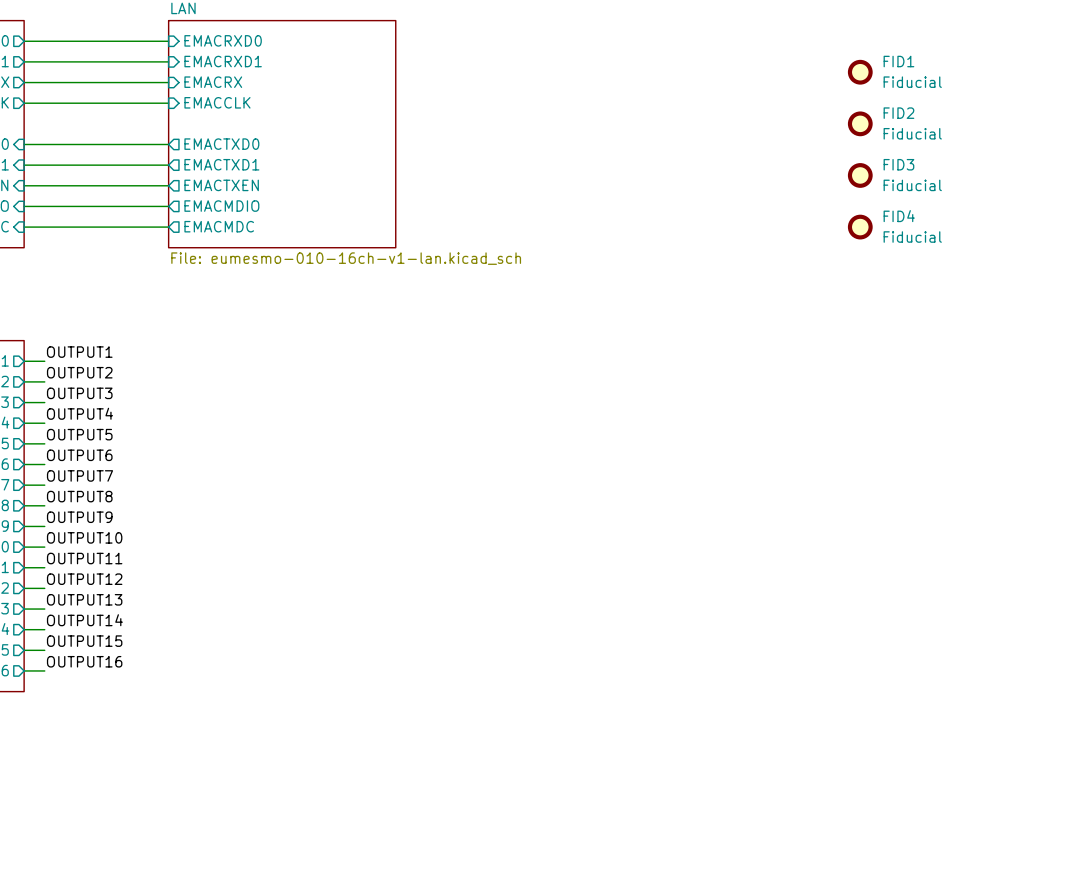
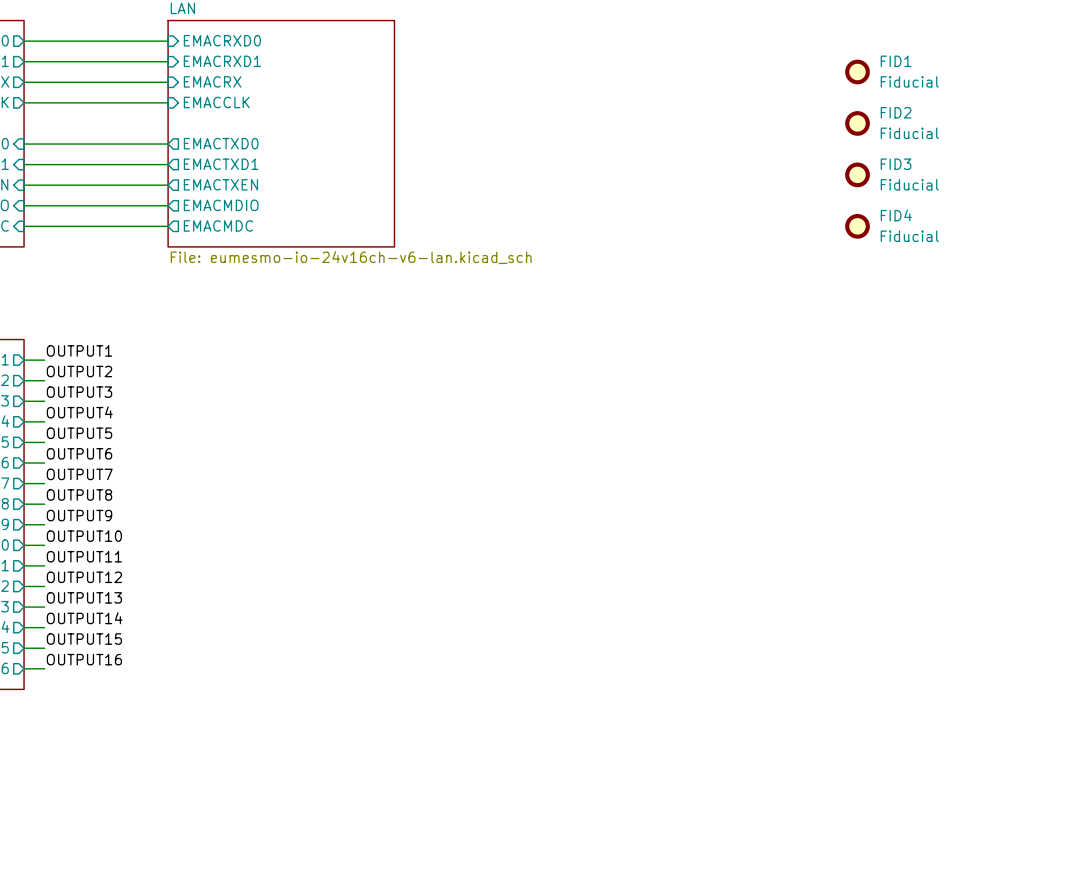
sheet LAN value: File: eumesmo-010-16ch-v1-lan.kicad_sch (346, 258) -> File: eumesmo-io-24v16ch-v6-lan.kicad_sch (351, 257)

